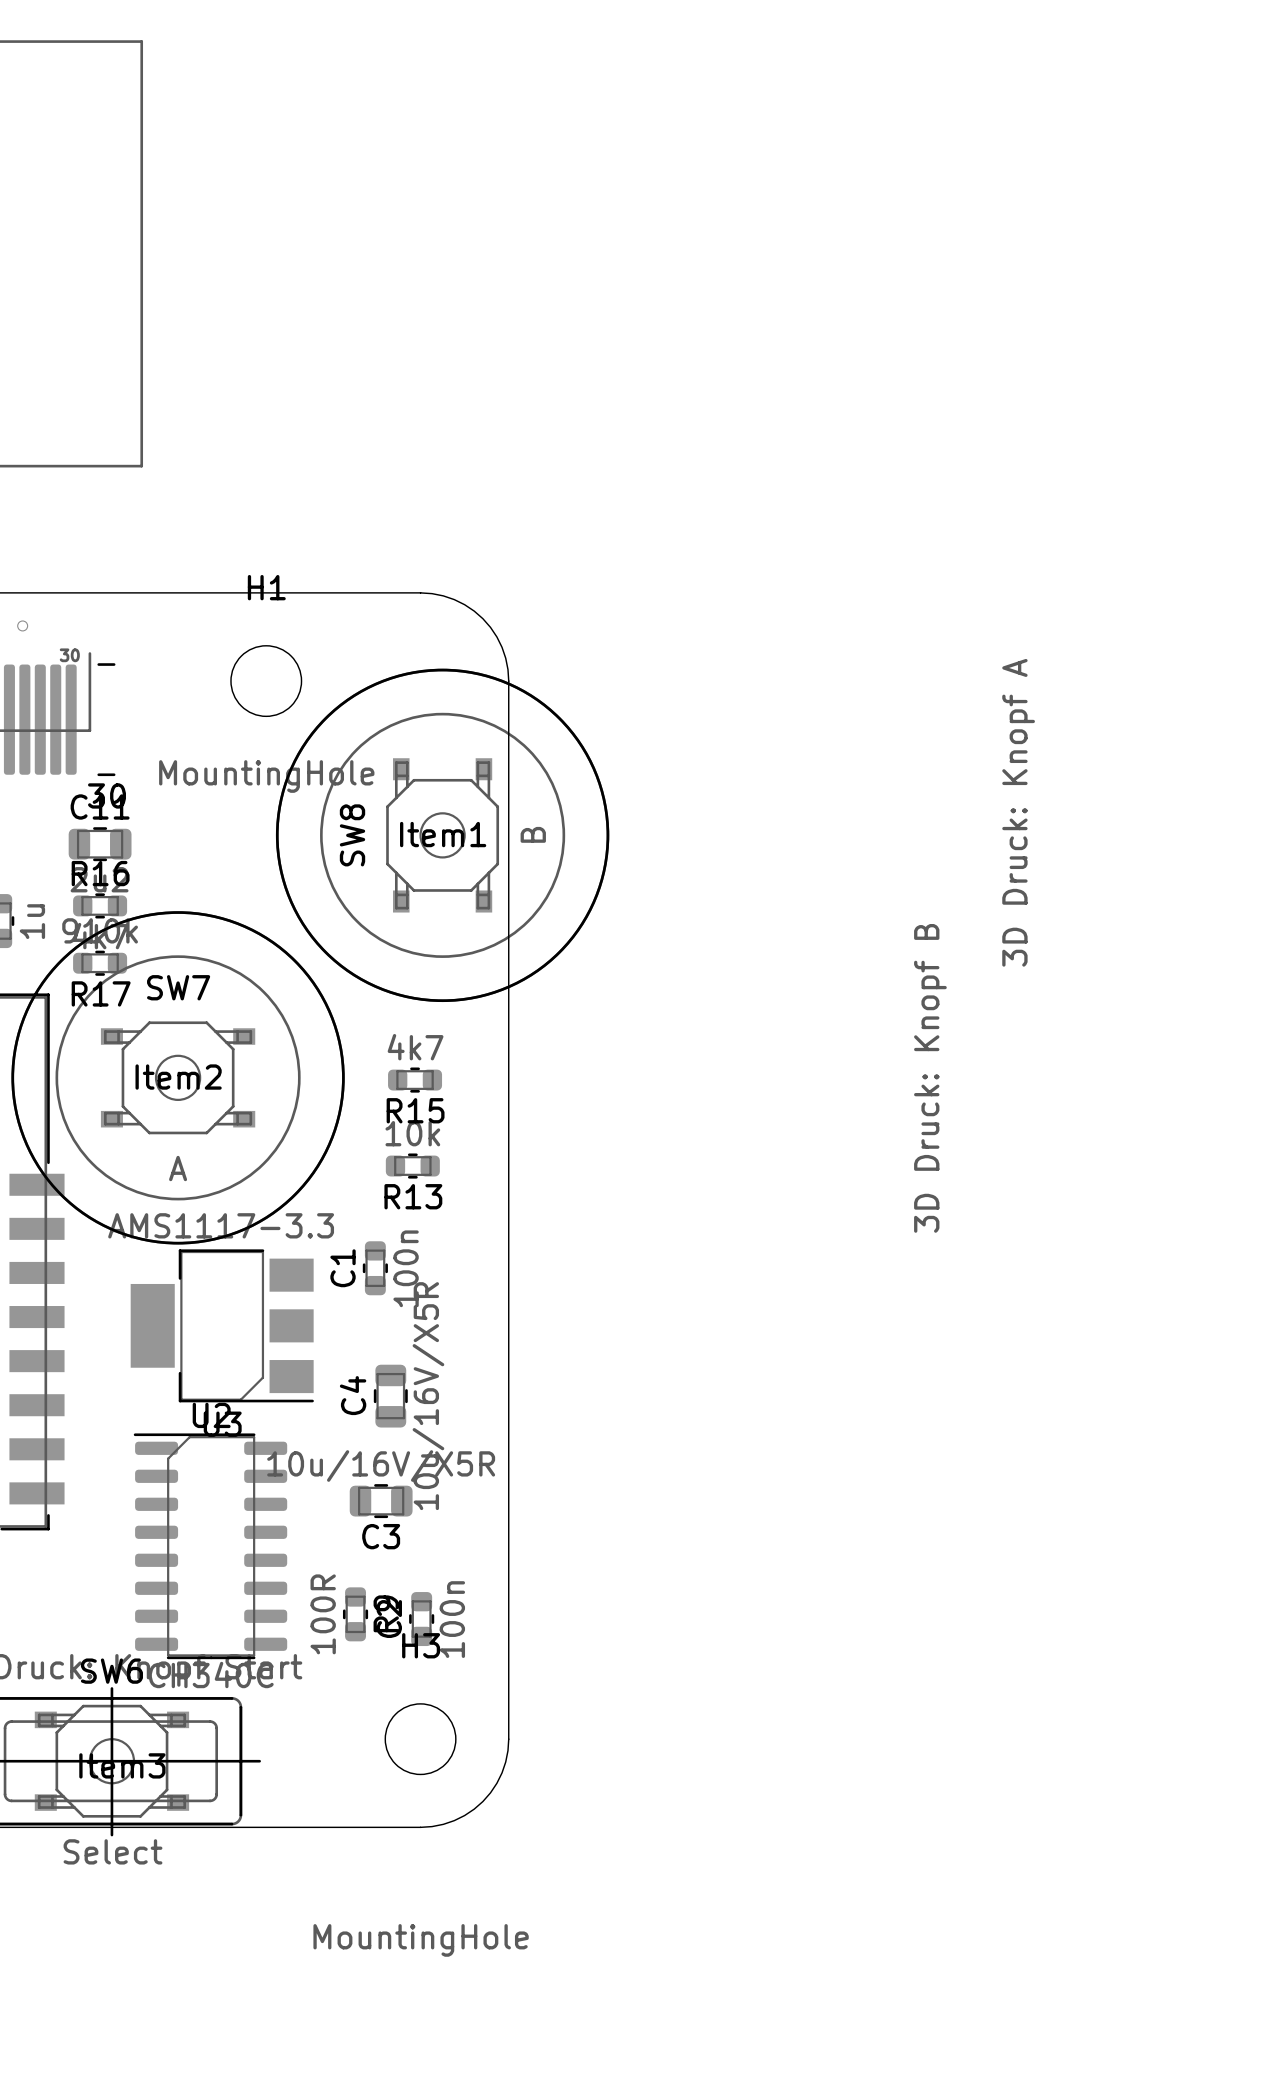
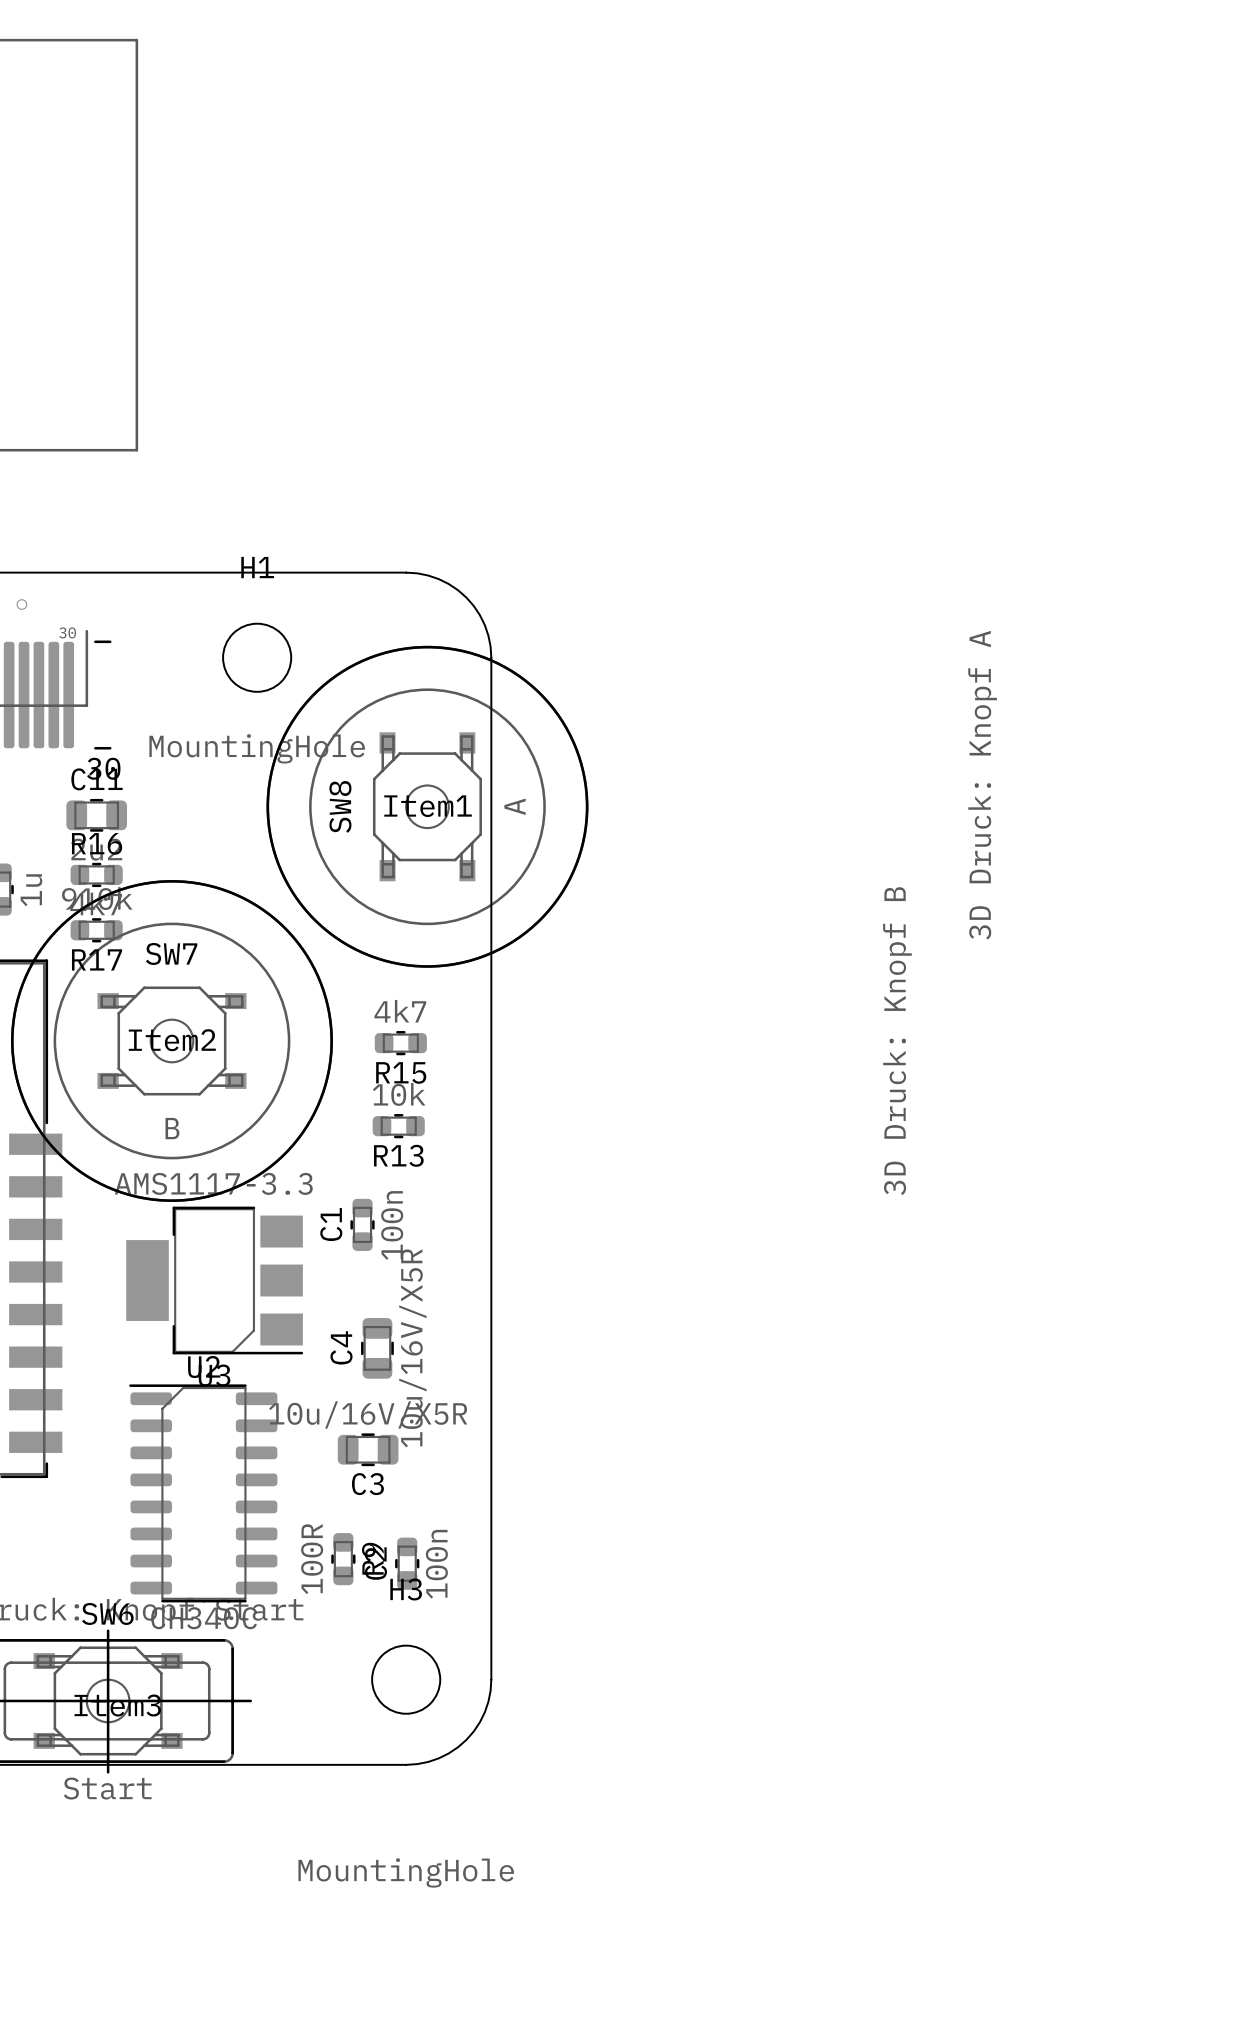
SW8 value: B (533, 834) -> A (515, 806)
SW7 value: A (178, 1168) -> B (172, 1128)
SW6 value: Select (112, 1851) -> Start (107, 1788)

